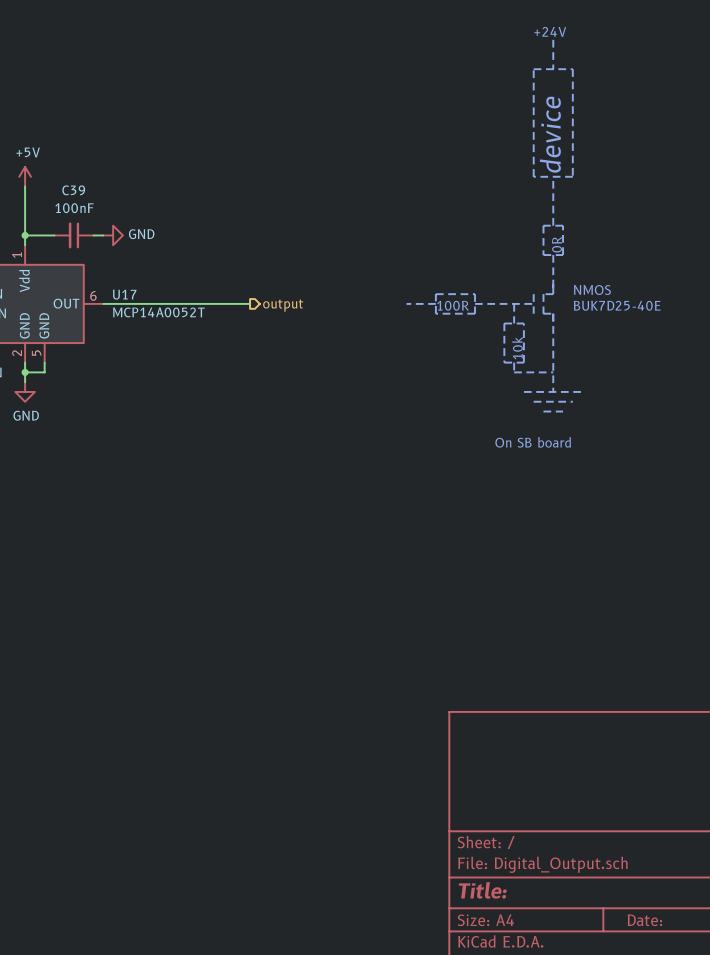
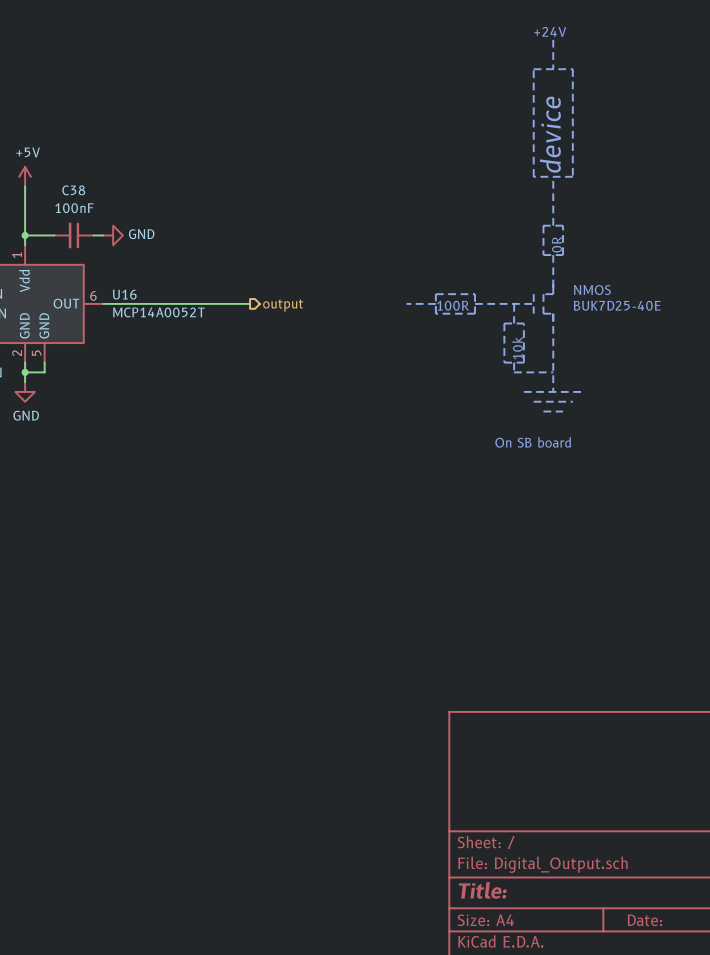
C39 name: C39 (73, 190) -> C38 (73, 190)
U17 name: U17 (124, 294) -> U16 (124, 294)

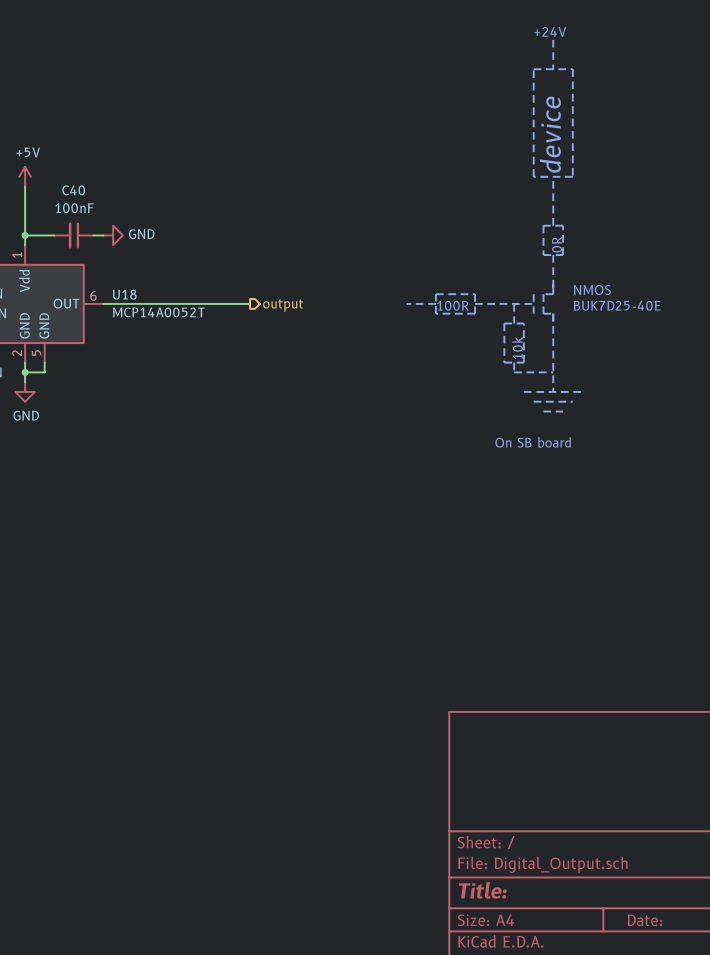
C38 name: C38 (73, 190) -> C40 (73, 190)
U16 name: U16 (124, 294) -> U18 (124, 294)

